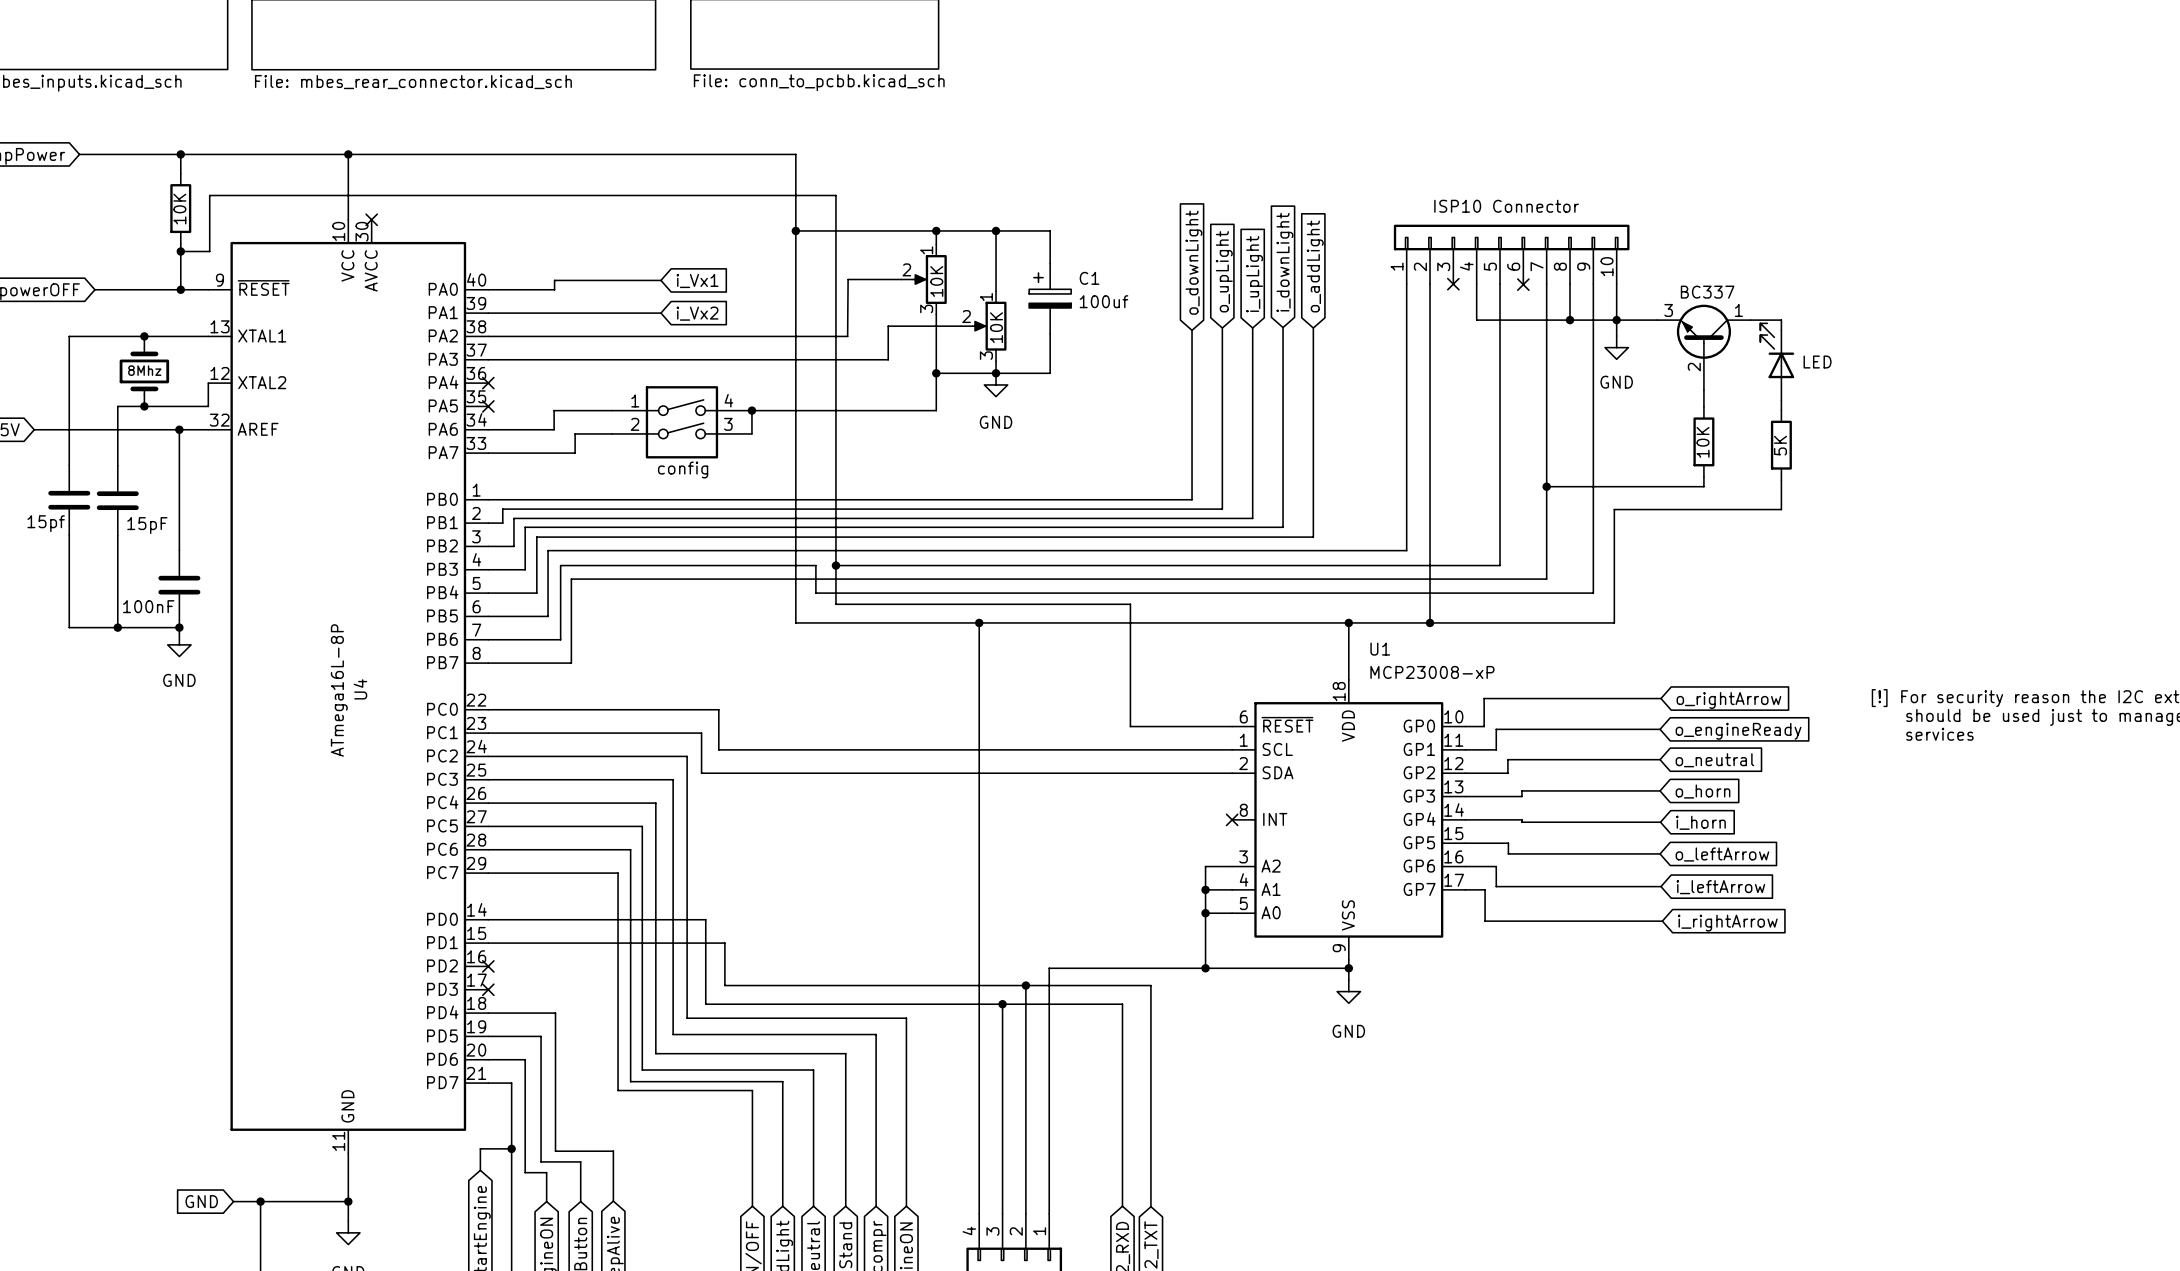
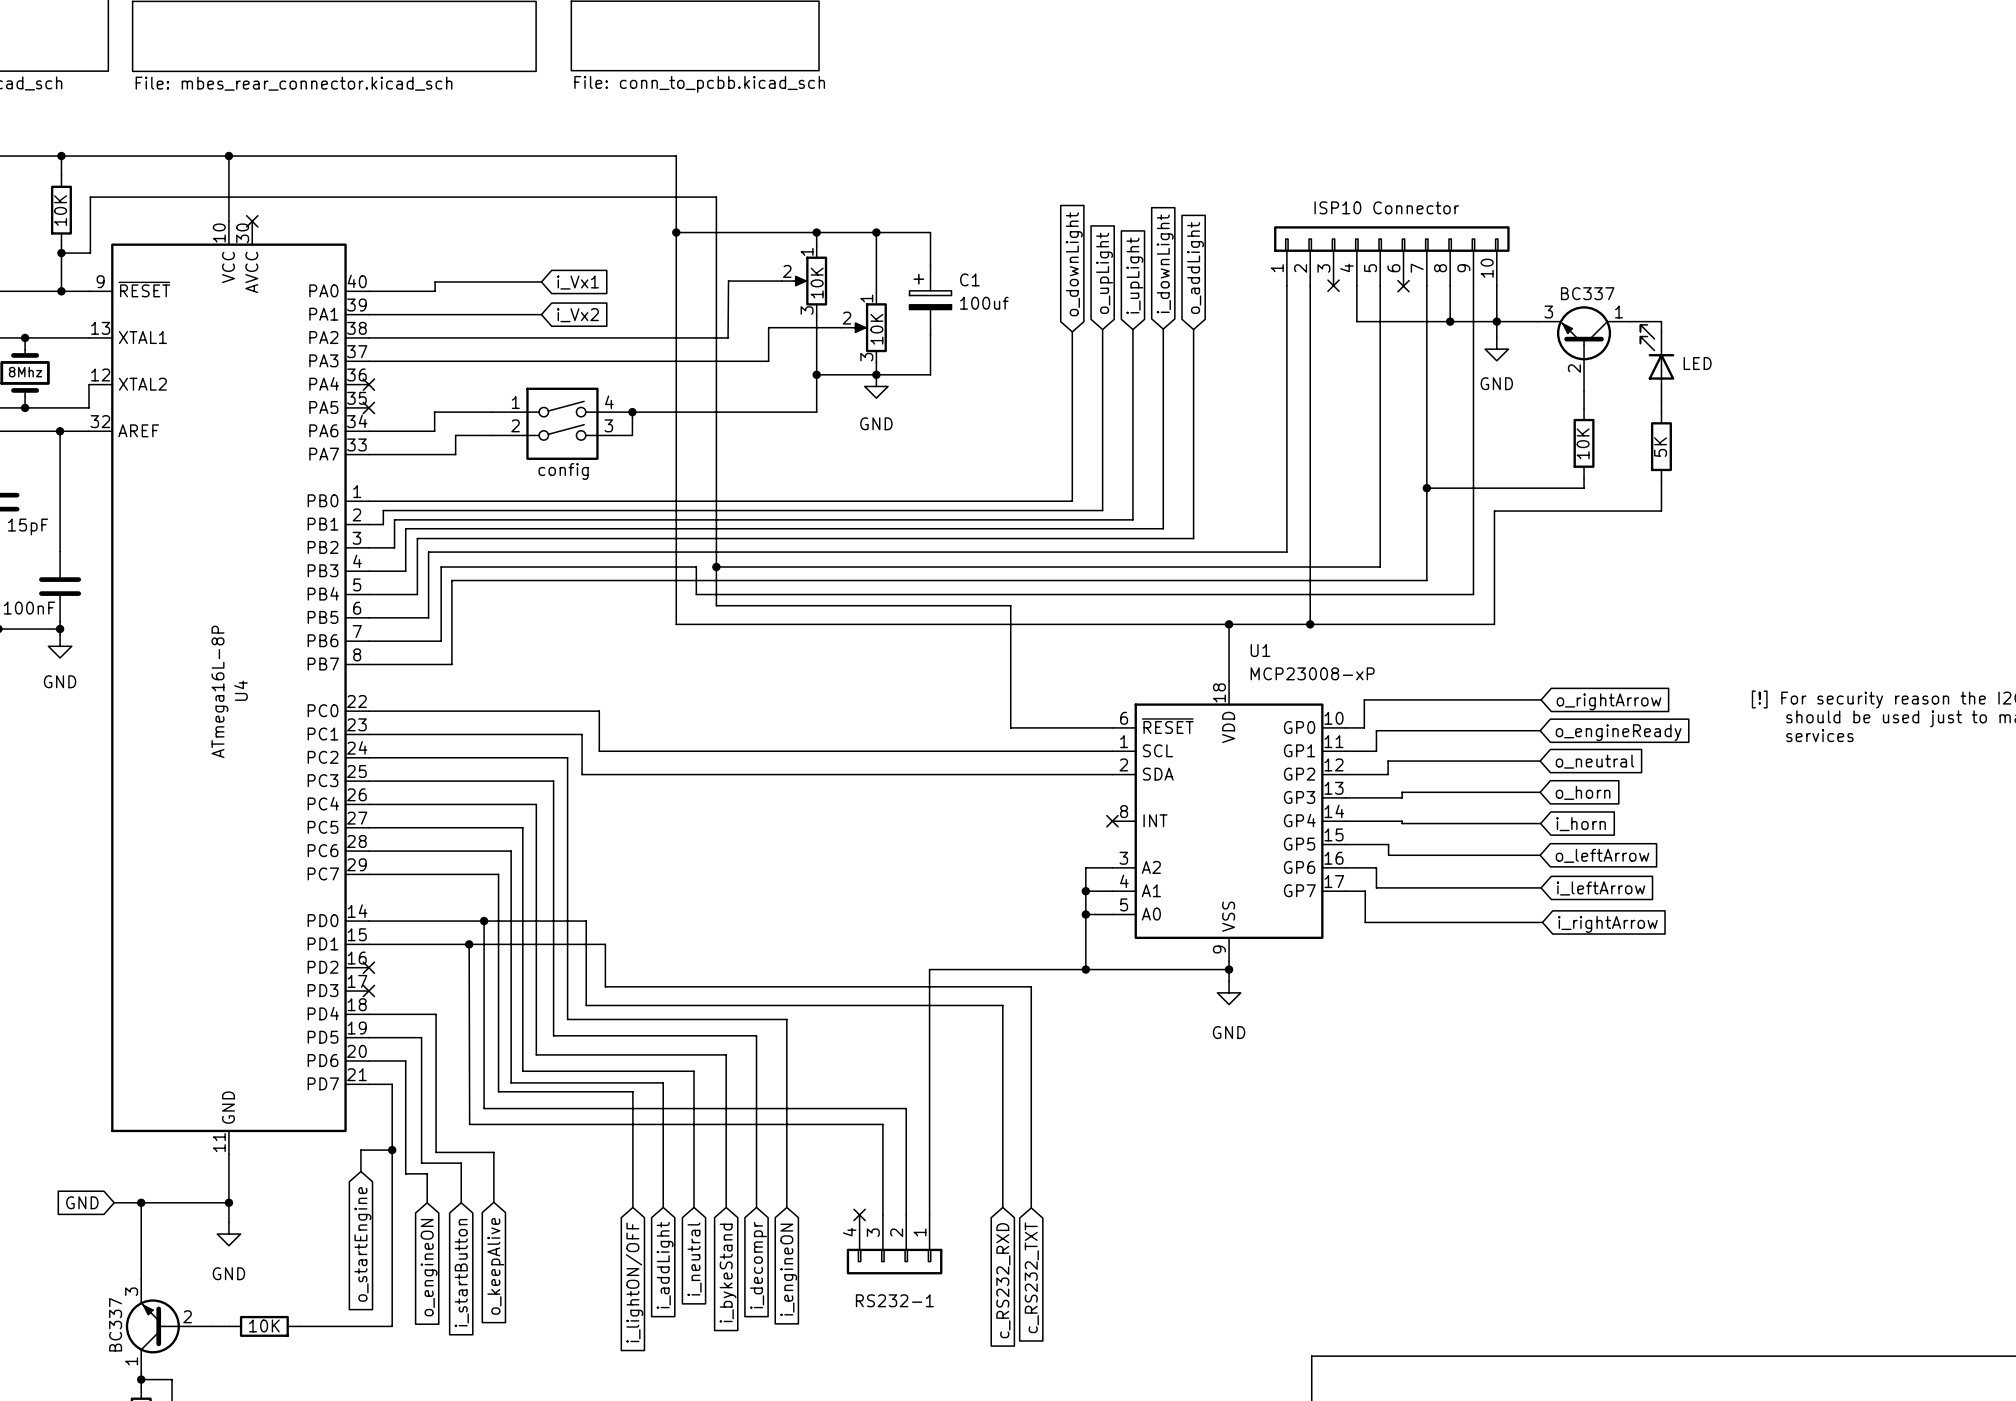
wire: (979, 622) (979, 1213) -> none
junction: (979, 622) -> none
junction: none -> (484, 921)
junction: none -> (469, 944)
wire: (1025, 985) (1025, 1107) -> (484, 921) (484, 1108) (906, 1108)
junction: (1025, 985) -> none
wire: (1002, 1004) (1002, 1123) -> (469, 944) (469, 1124) (882, 1124)
junction: (1002, 1004) -> none
no-connect mark: none -> (859, 1214)

